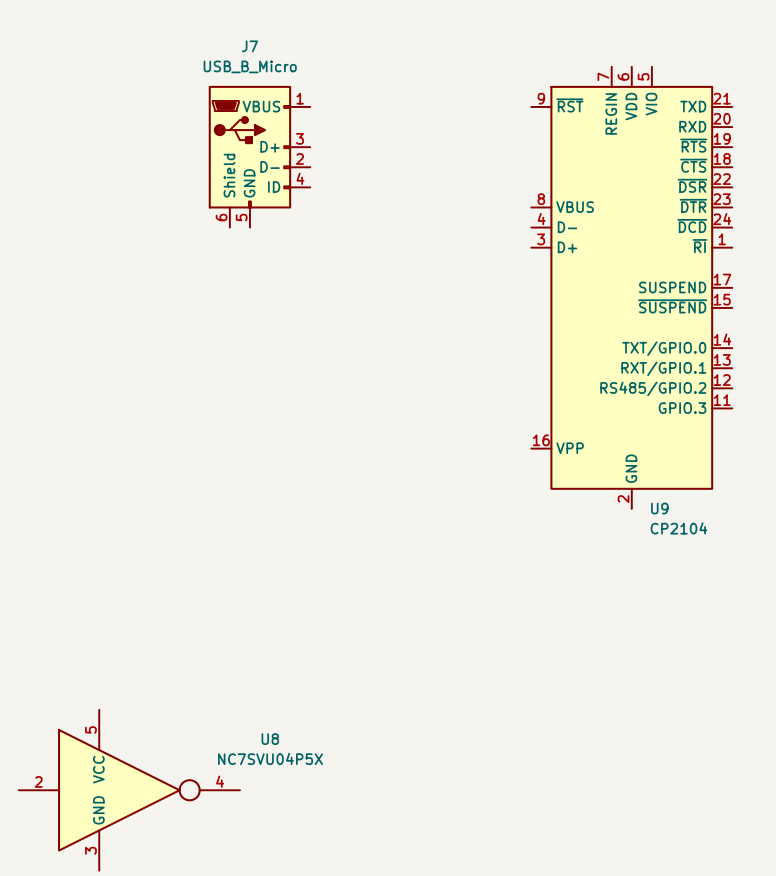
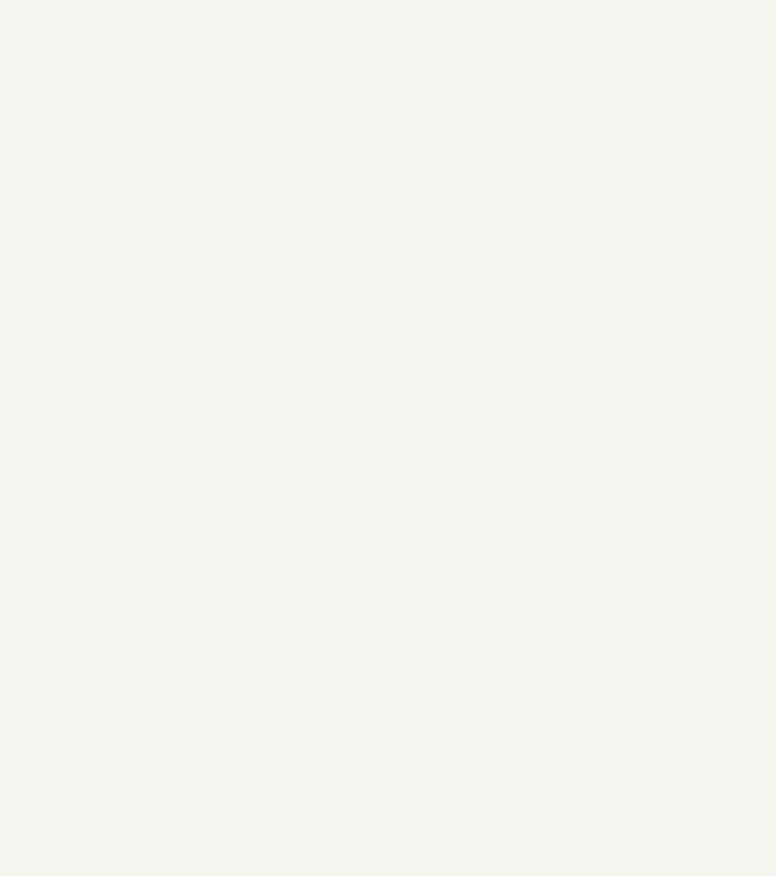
J7: USB_B_Micro (259, 156) -> none
U9: CP2104 (631, 287) -> none
U8: NC7SVU04P5X (129, 790) -> none

